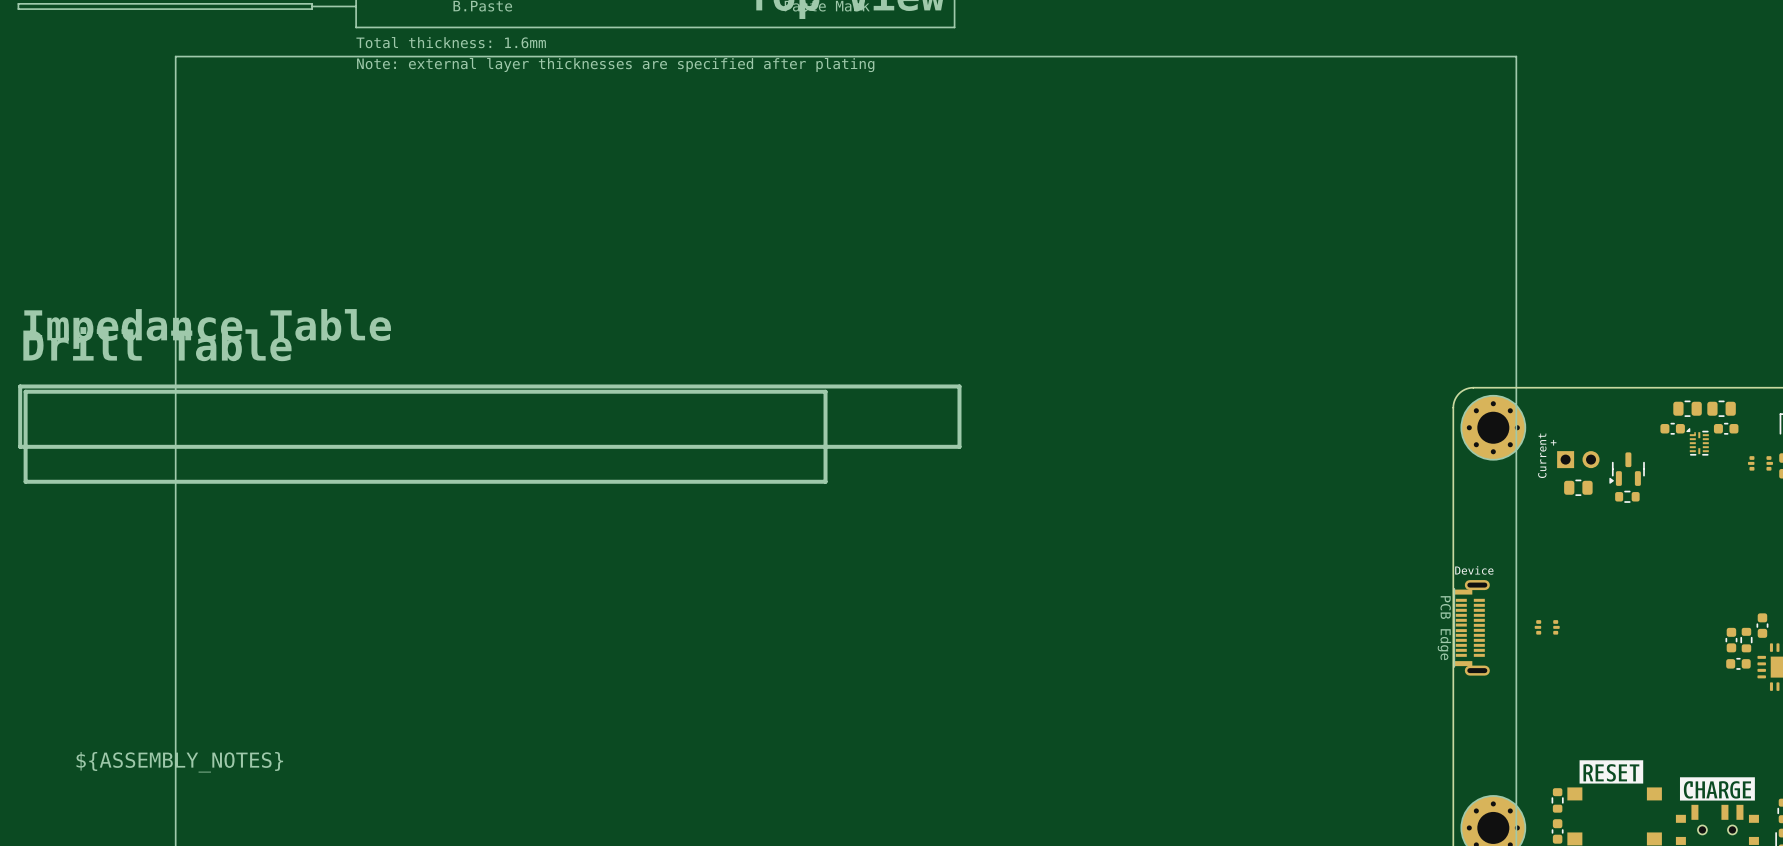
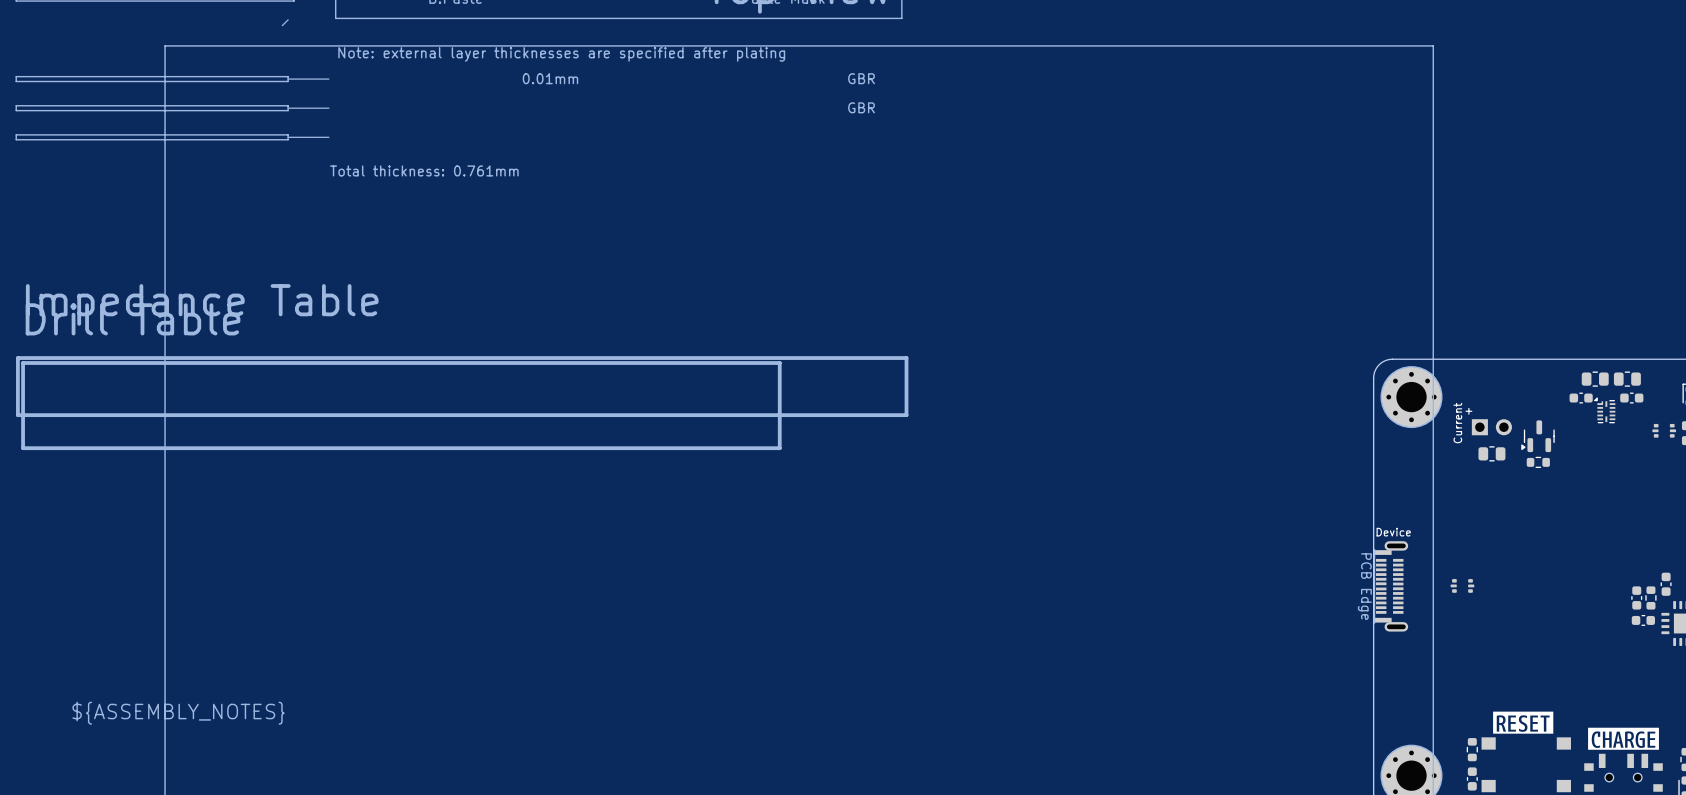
line: none -> (288, 19) (282, 25)
text: Total thickness: 1.6mm (451, 42) -> none
line: none -> (16, 76) (288, 76) (288, 81) (16, 81) (16, 76)
line: none -> (288, 79) (328, 79)
text: none -> 0.01mm (550, 78)
text: none -> GBR (861, 78)
line: none -> (16, 105) (16, 110) (288, 110) (288, 105) (16, 105)
text: none -> GBR (861, 107)
line: none -> (288, 108) (328, 108)
line: none -> (16, 134) (16, 139) (288, 139) (288, 134) (16, 134)
line: none -> (288, 137) (328, 137)
text: none -> Total thickness: 0.761mm (424, 170)

